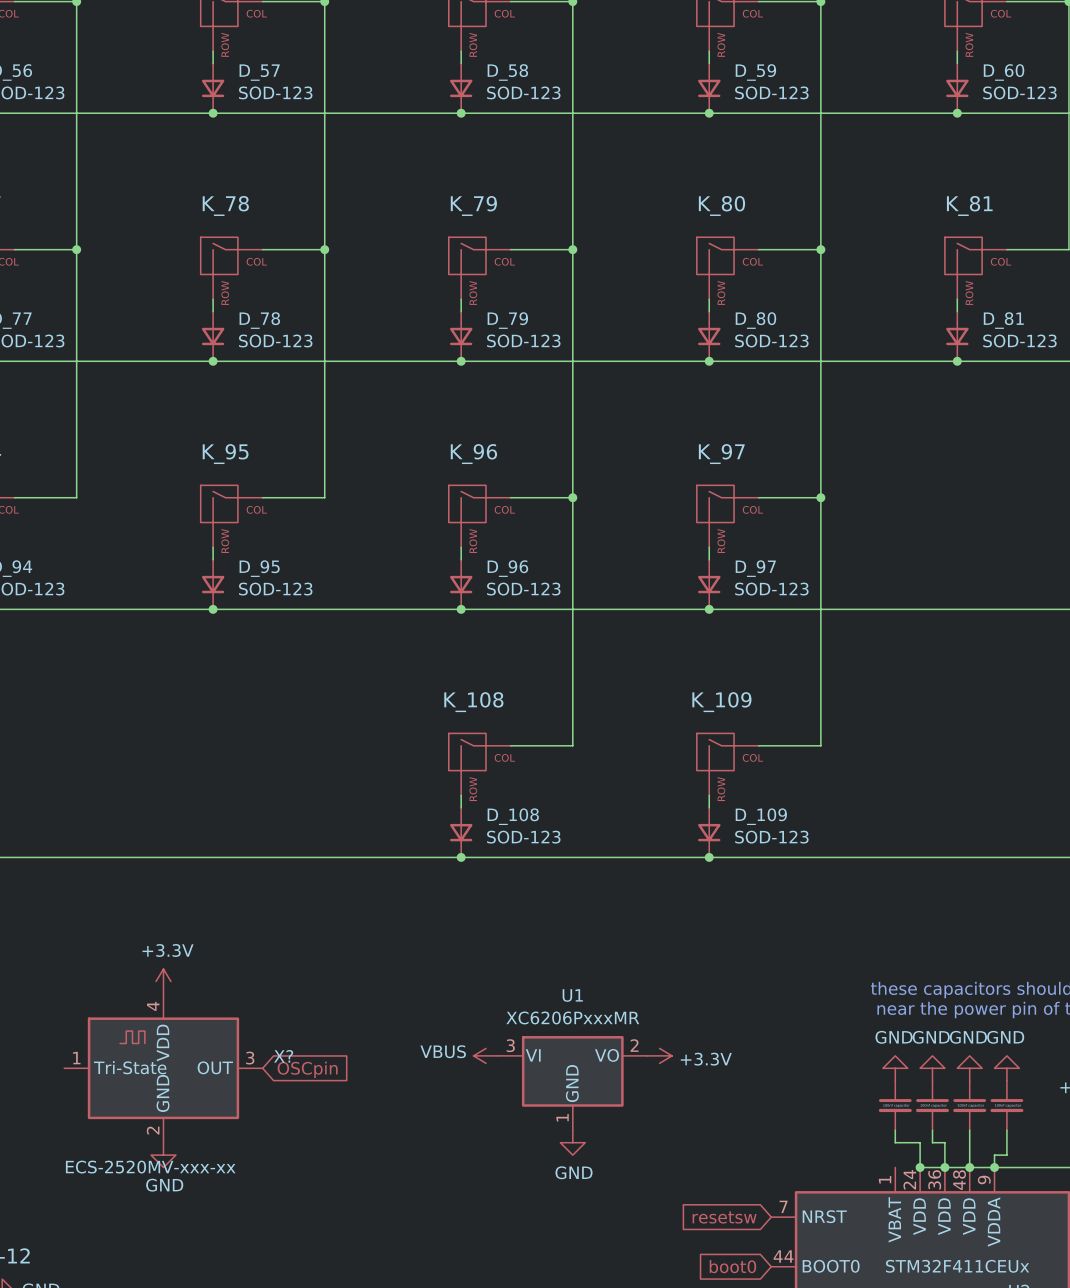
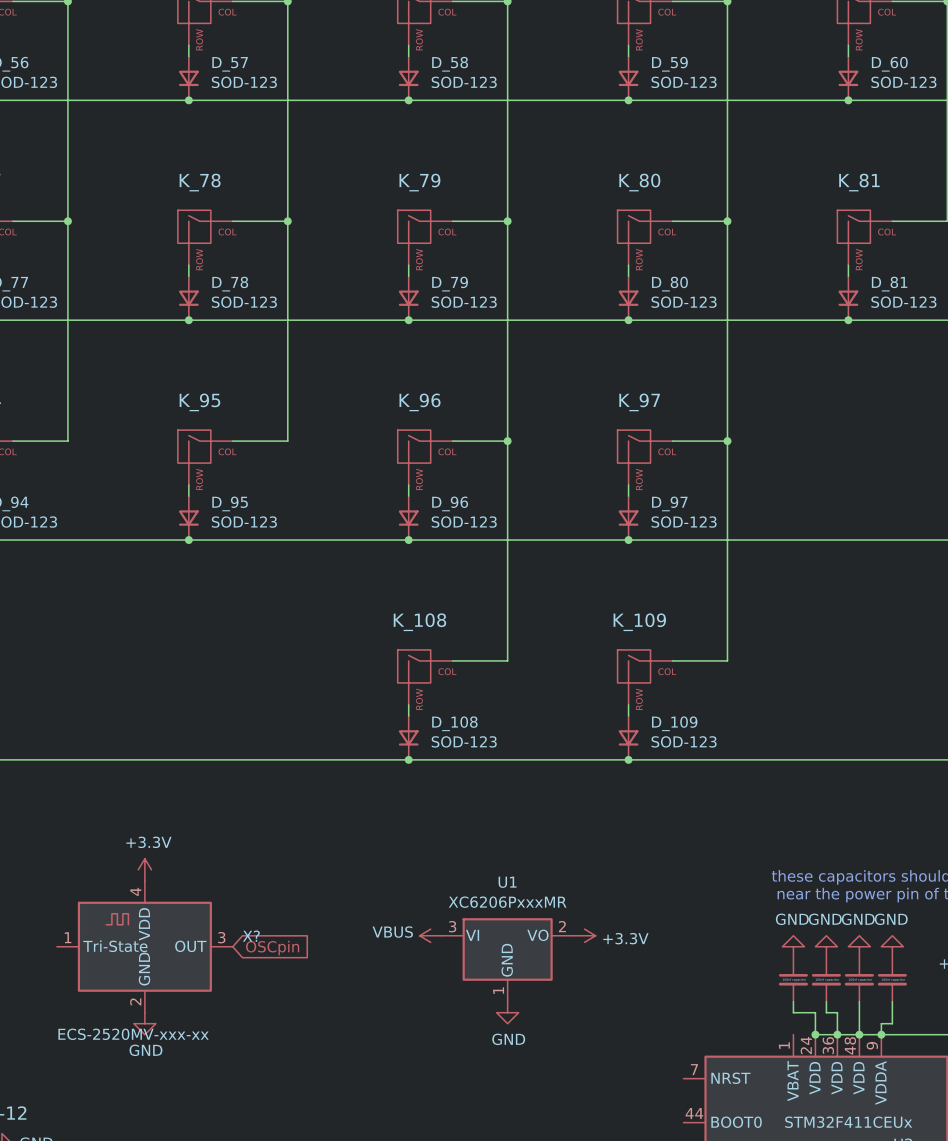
global label: resetsw (724, 1217) -> none
global label: boot0 (732, 1266) -> none

